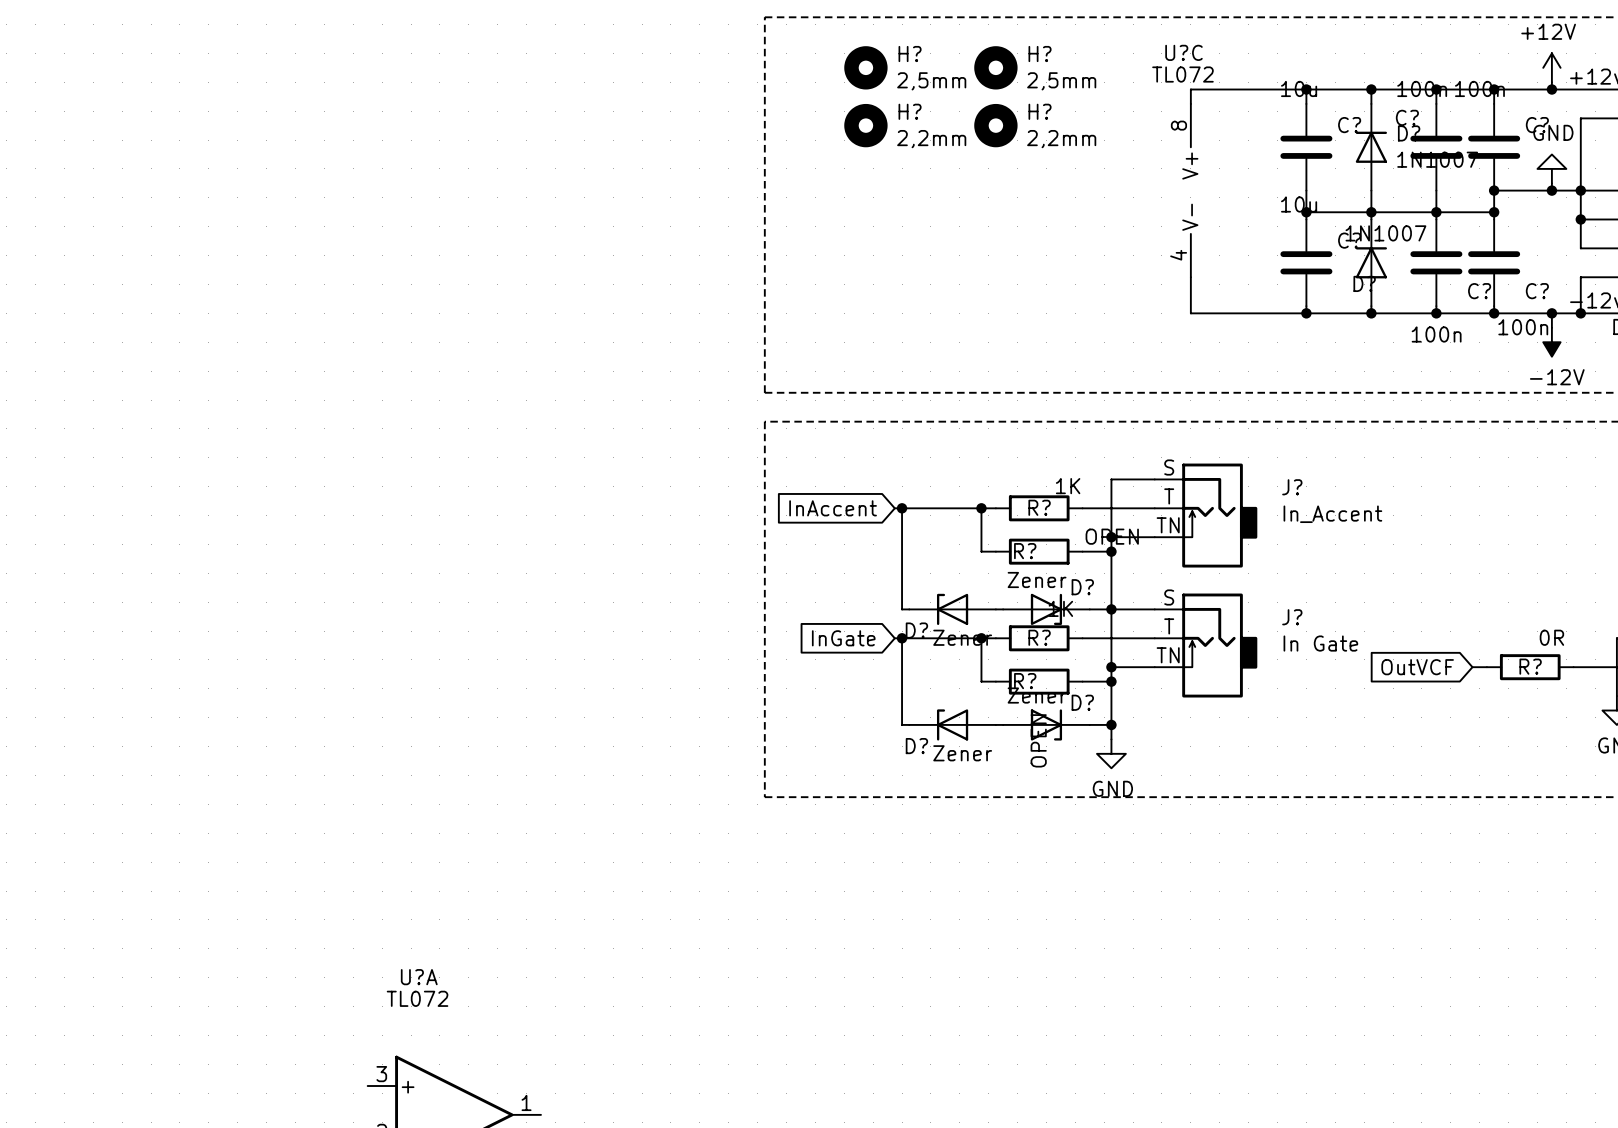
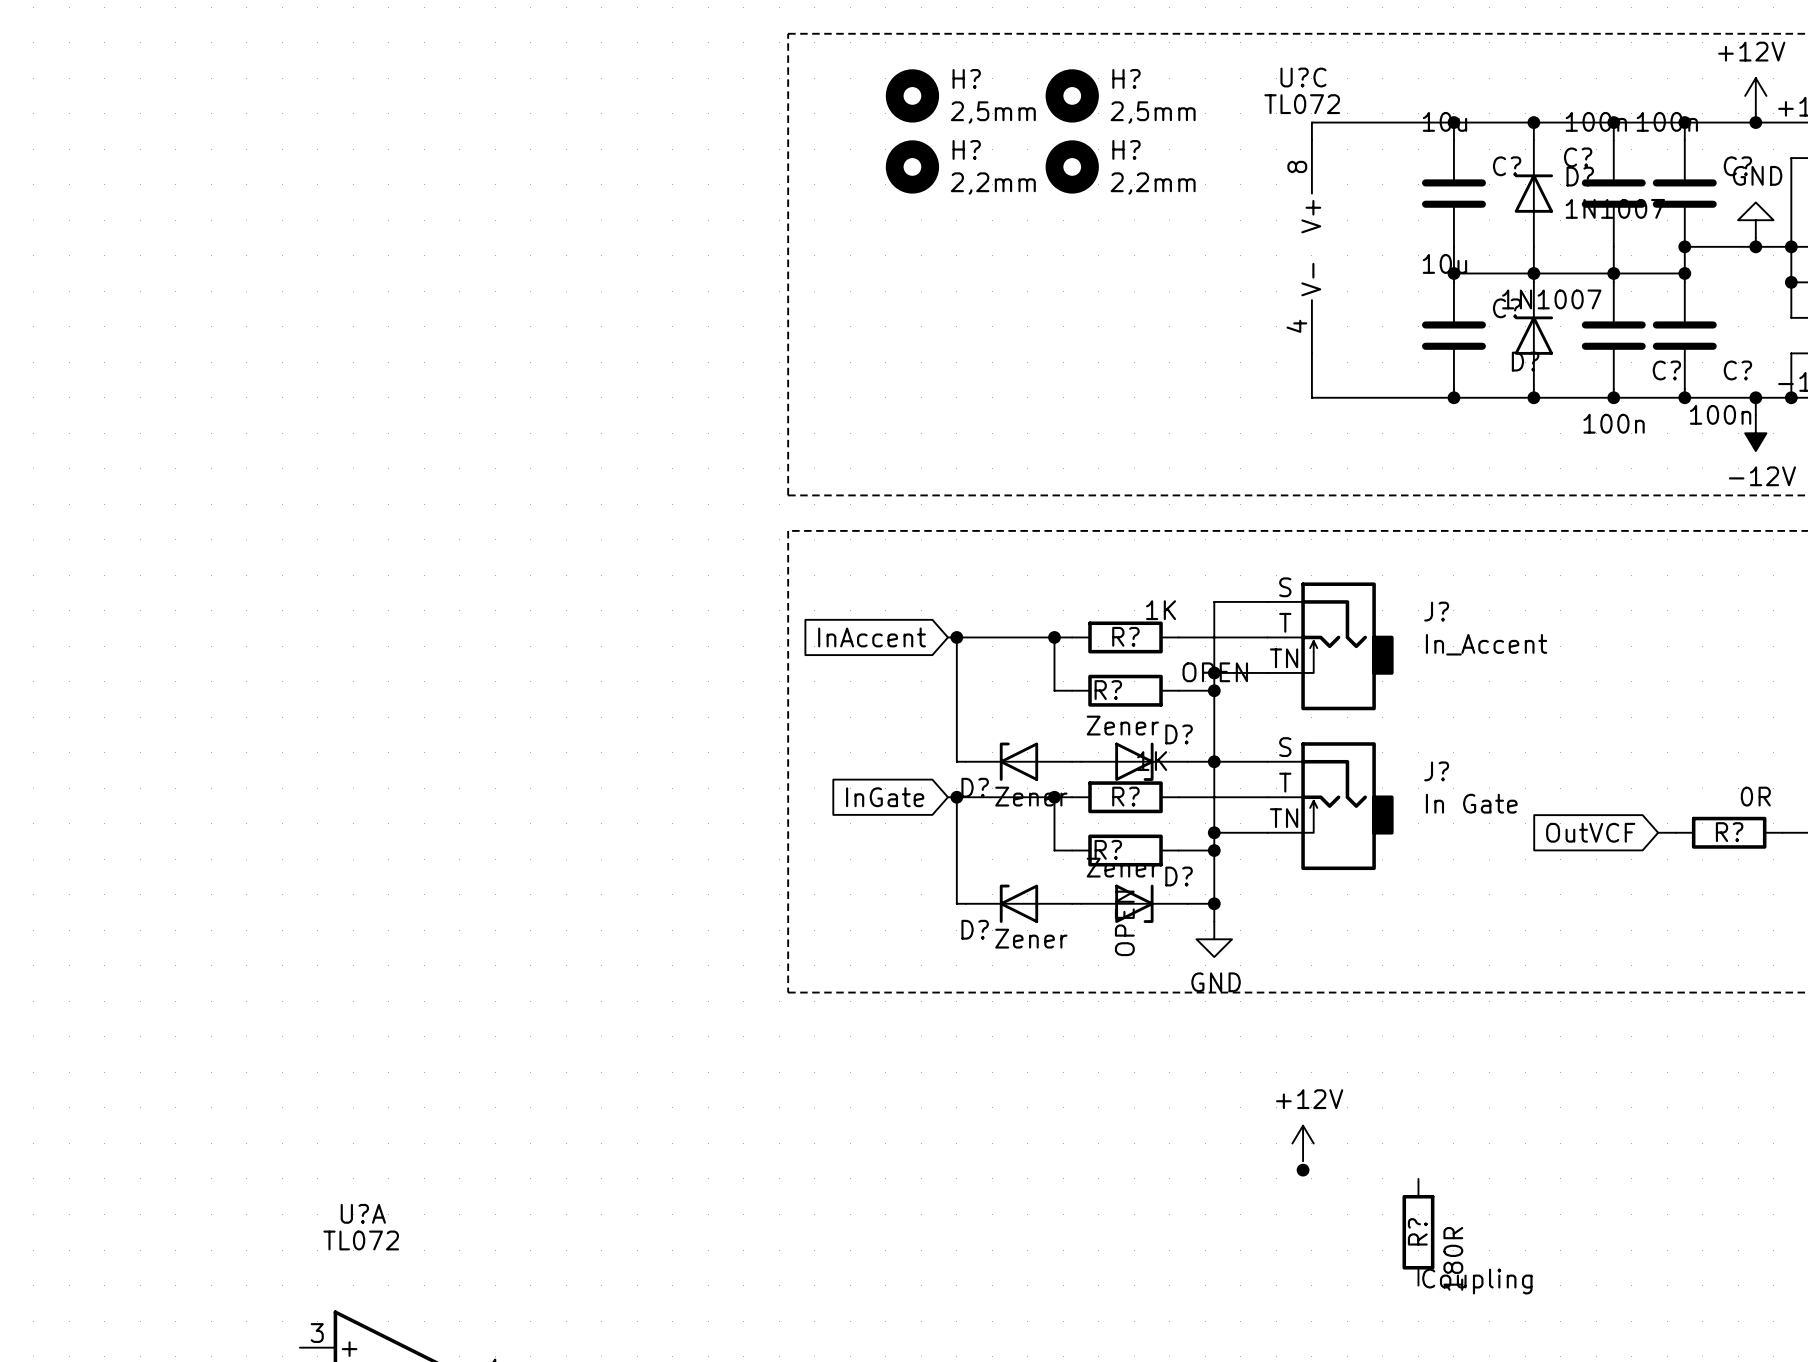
power symbol: none -> +12V (1303, 1143)
junction: none -> (1303, 1170)
R?: none -> 180R (1418, 1232)
label: none -> Coupling (1477, 1281)

